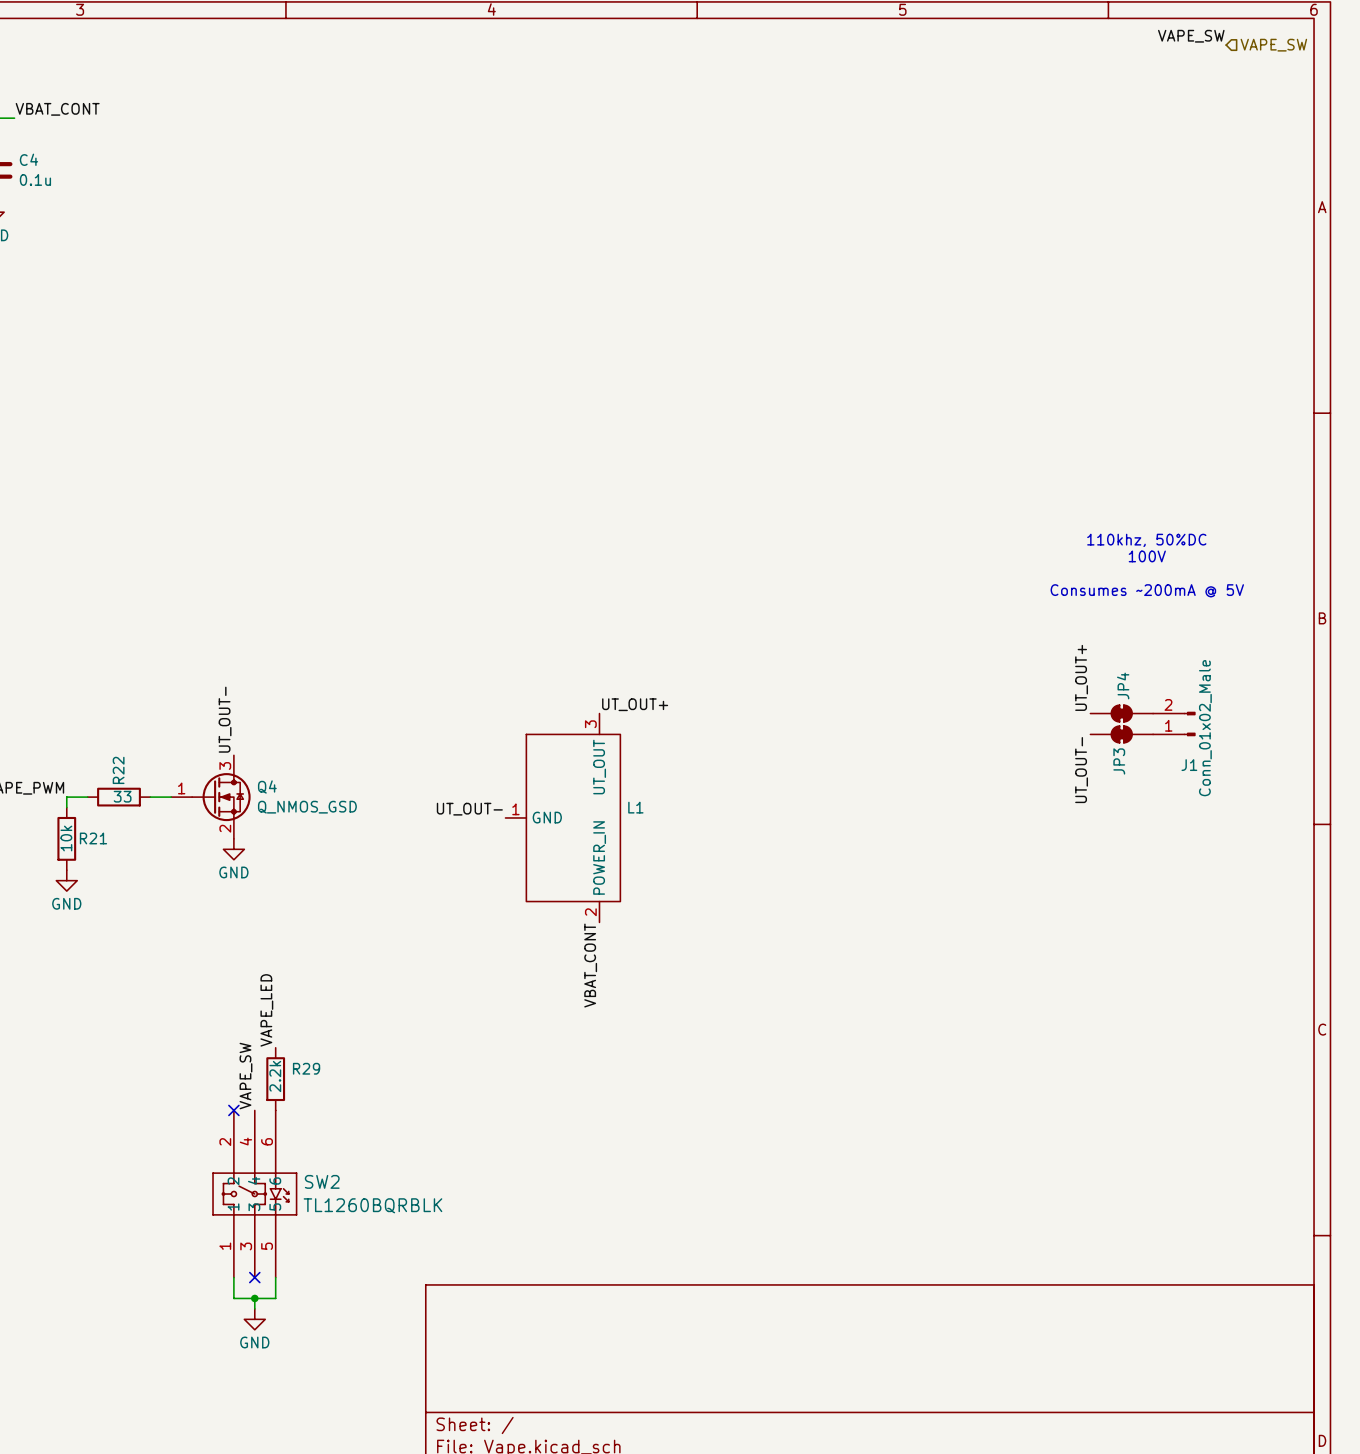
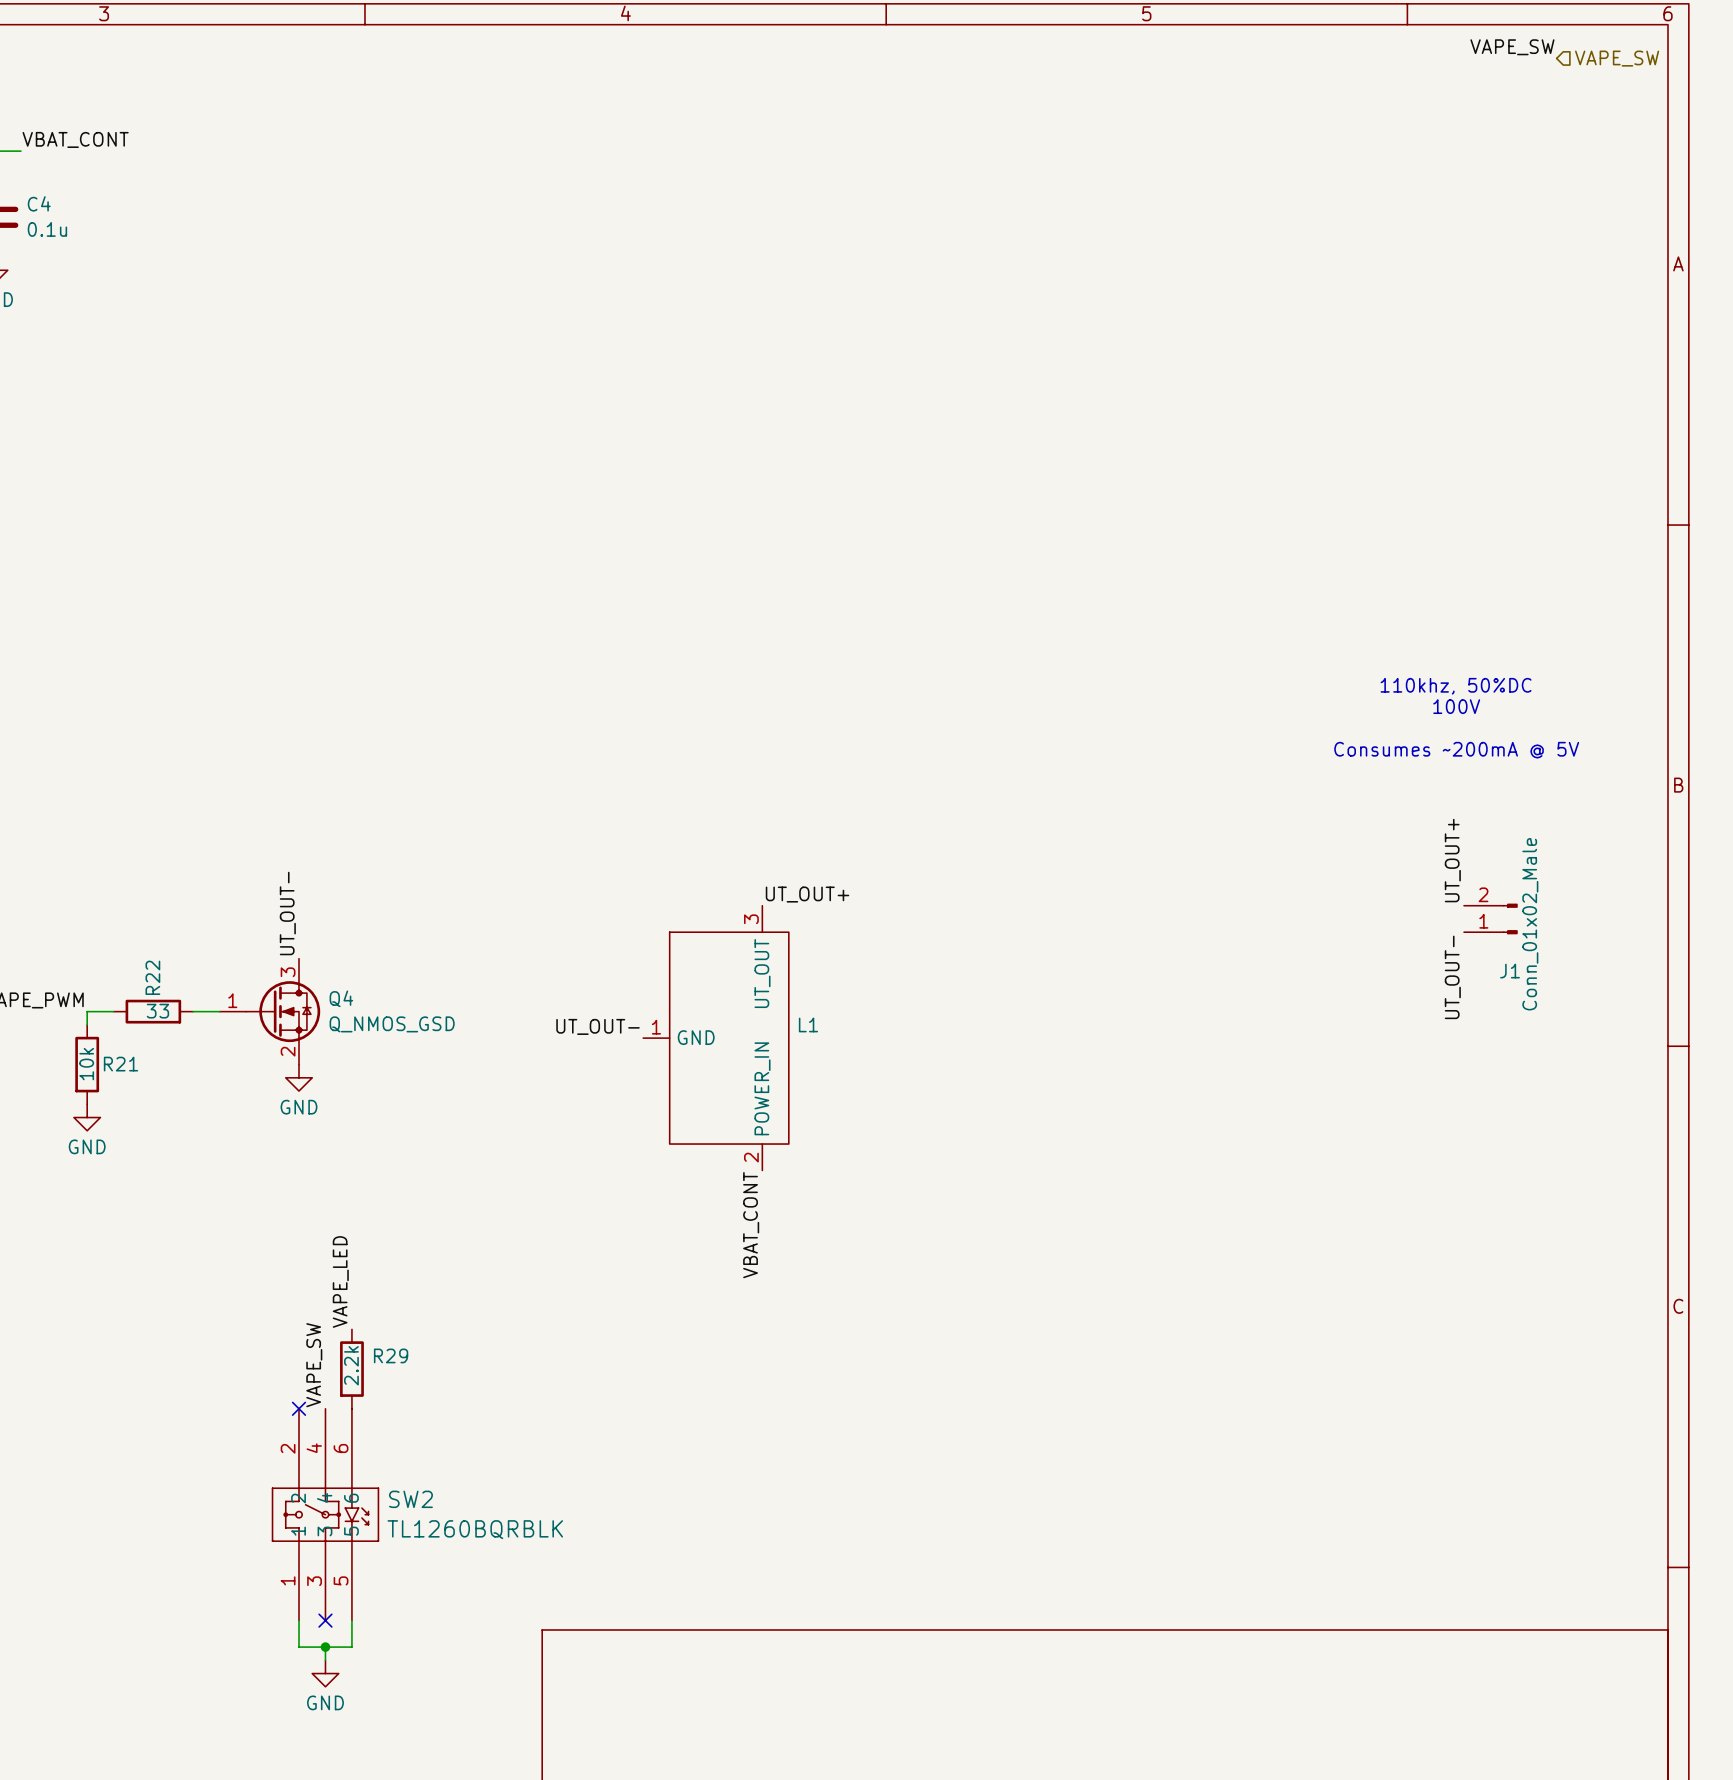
label position: UT_OUT+ (1081, 677) -> UT_OUT+ (1452, 860)
JP4: (1121, 713) -> none
JP3: (1121, 734) -> none
label position: UT_OUT- (1081, 770) -> UT_OUT- (1452, 977)

